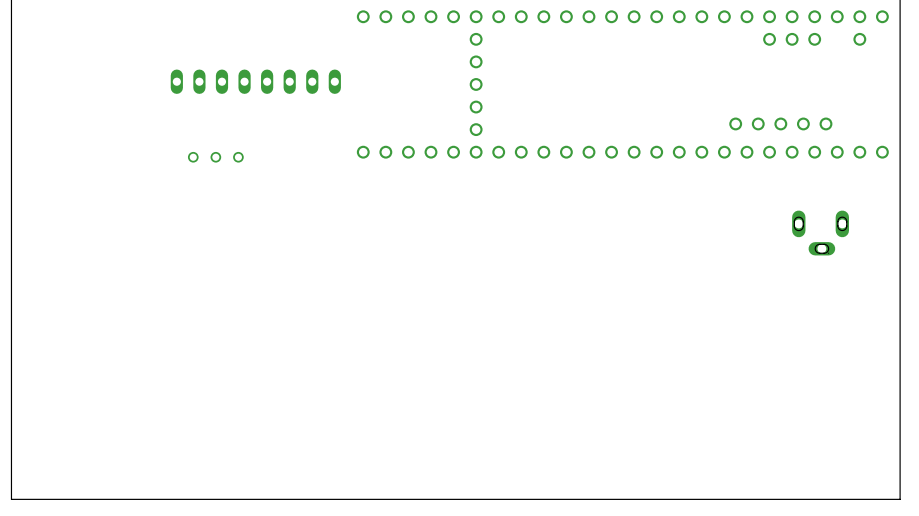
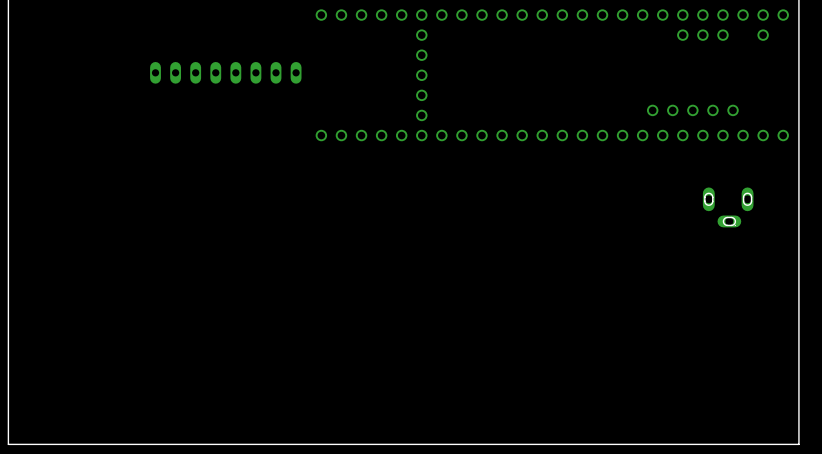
part: (215, 157) -> none

